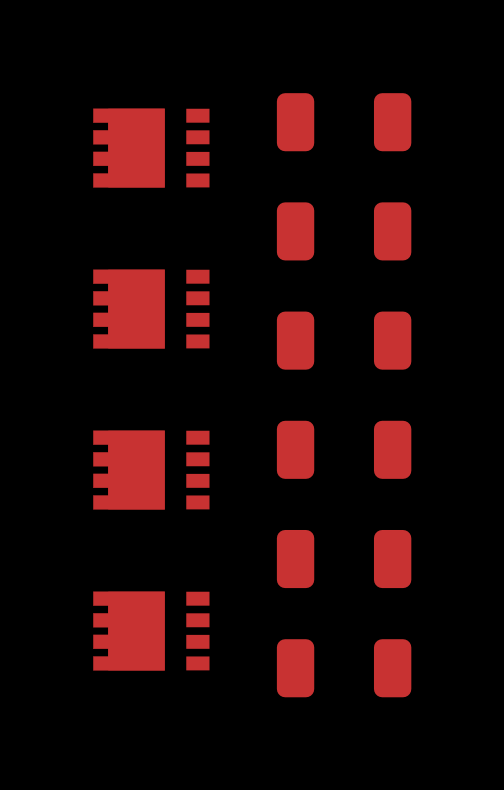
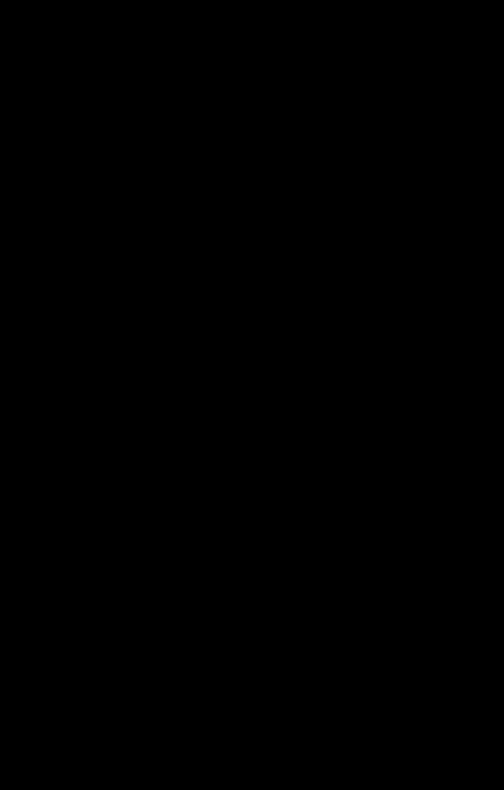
part: (344, 122) -> none
part: (151, 148) -> none
part: (344, 231) -> none
part: (151, 309) -> none
part: (344, 340) -> none
part: (344, 449) -> none
part: (151, 470) -> none
part: (344, 559) -> none
part: (151, 631) -> none
part: (344, 668) -> none

